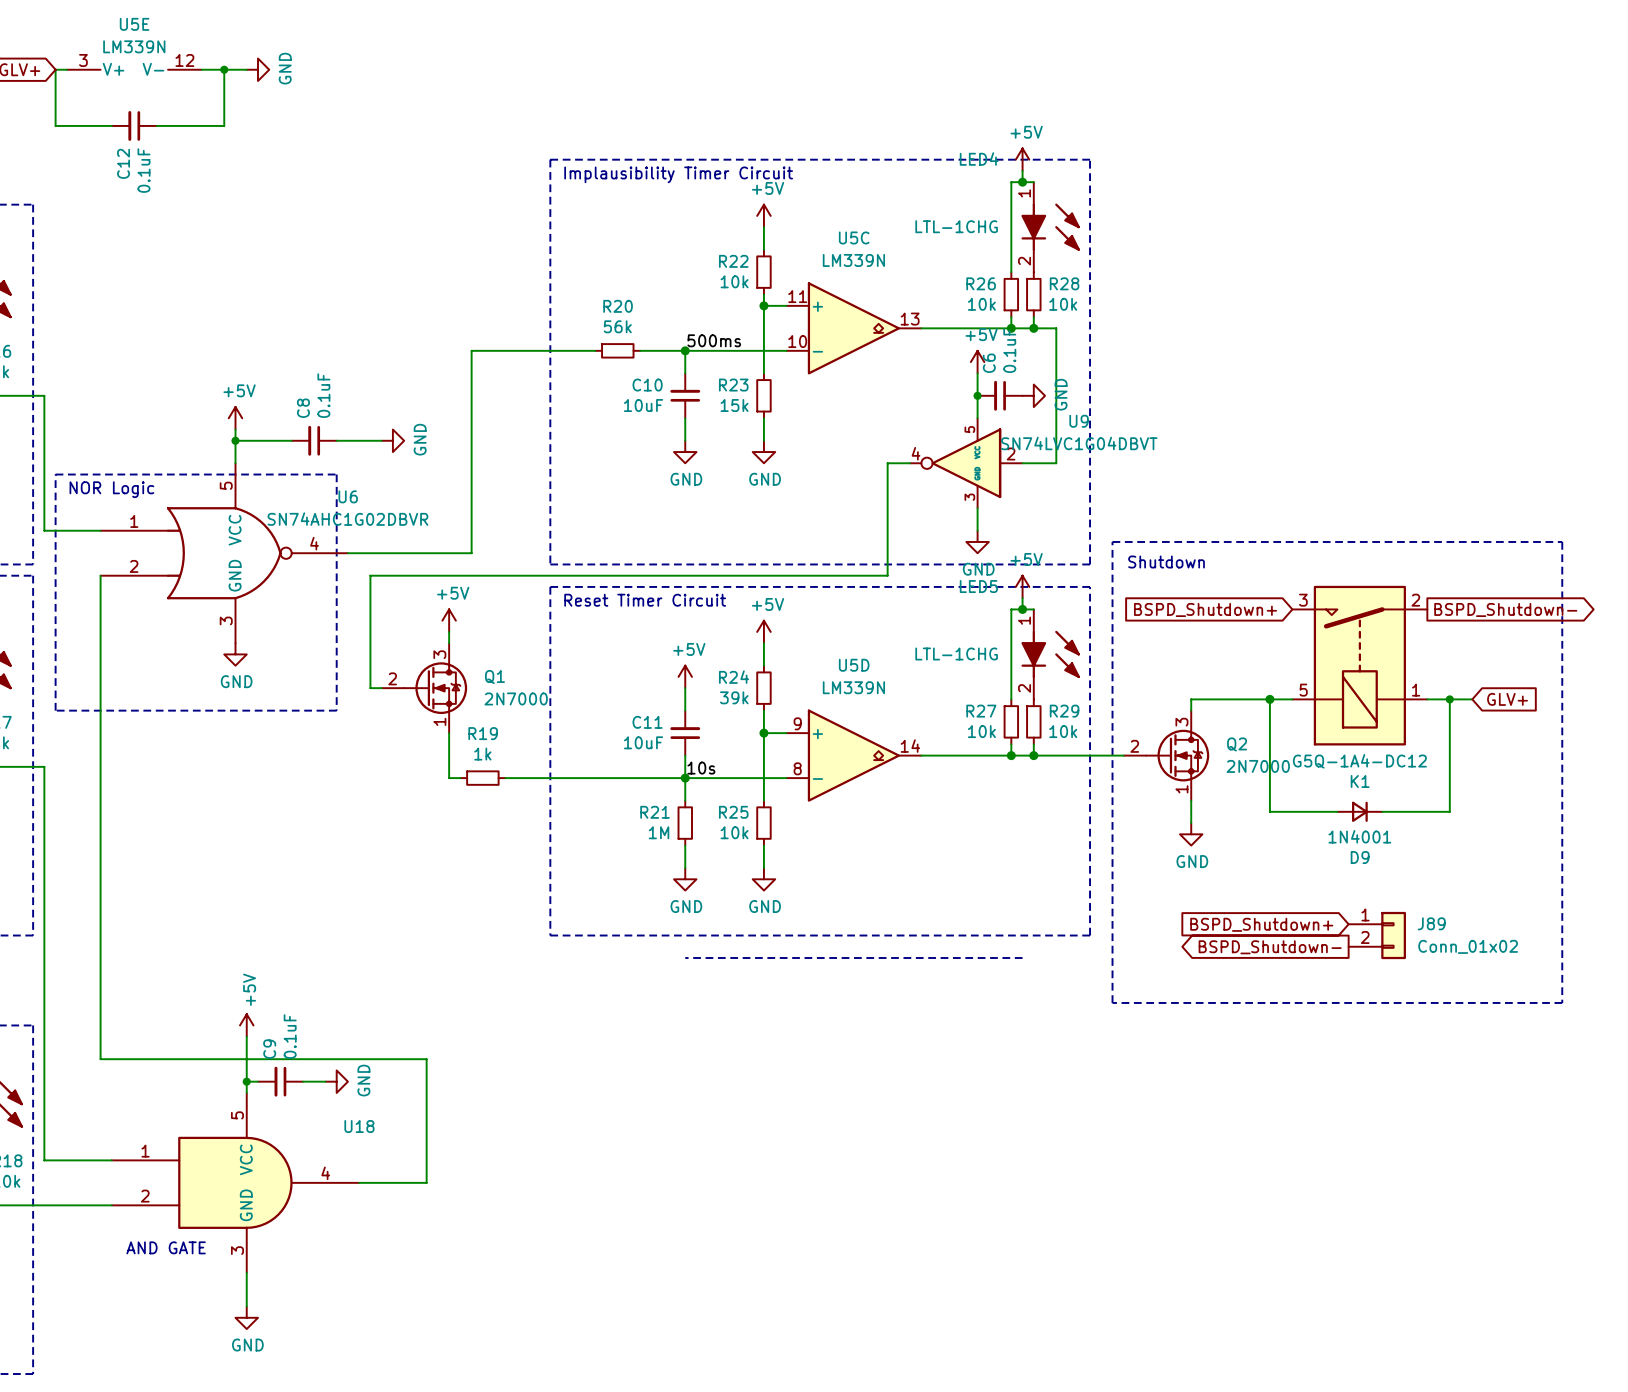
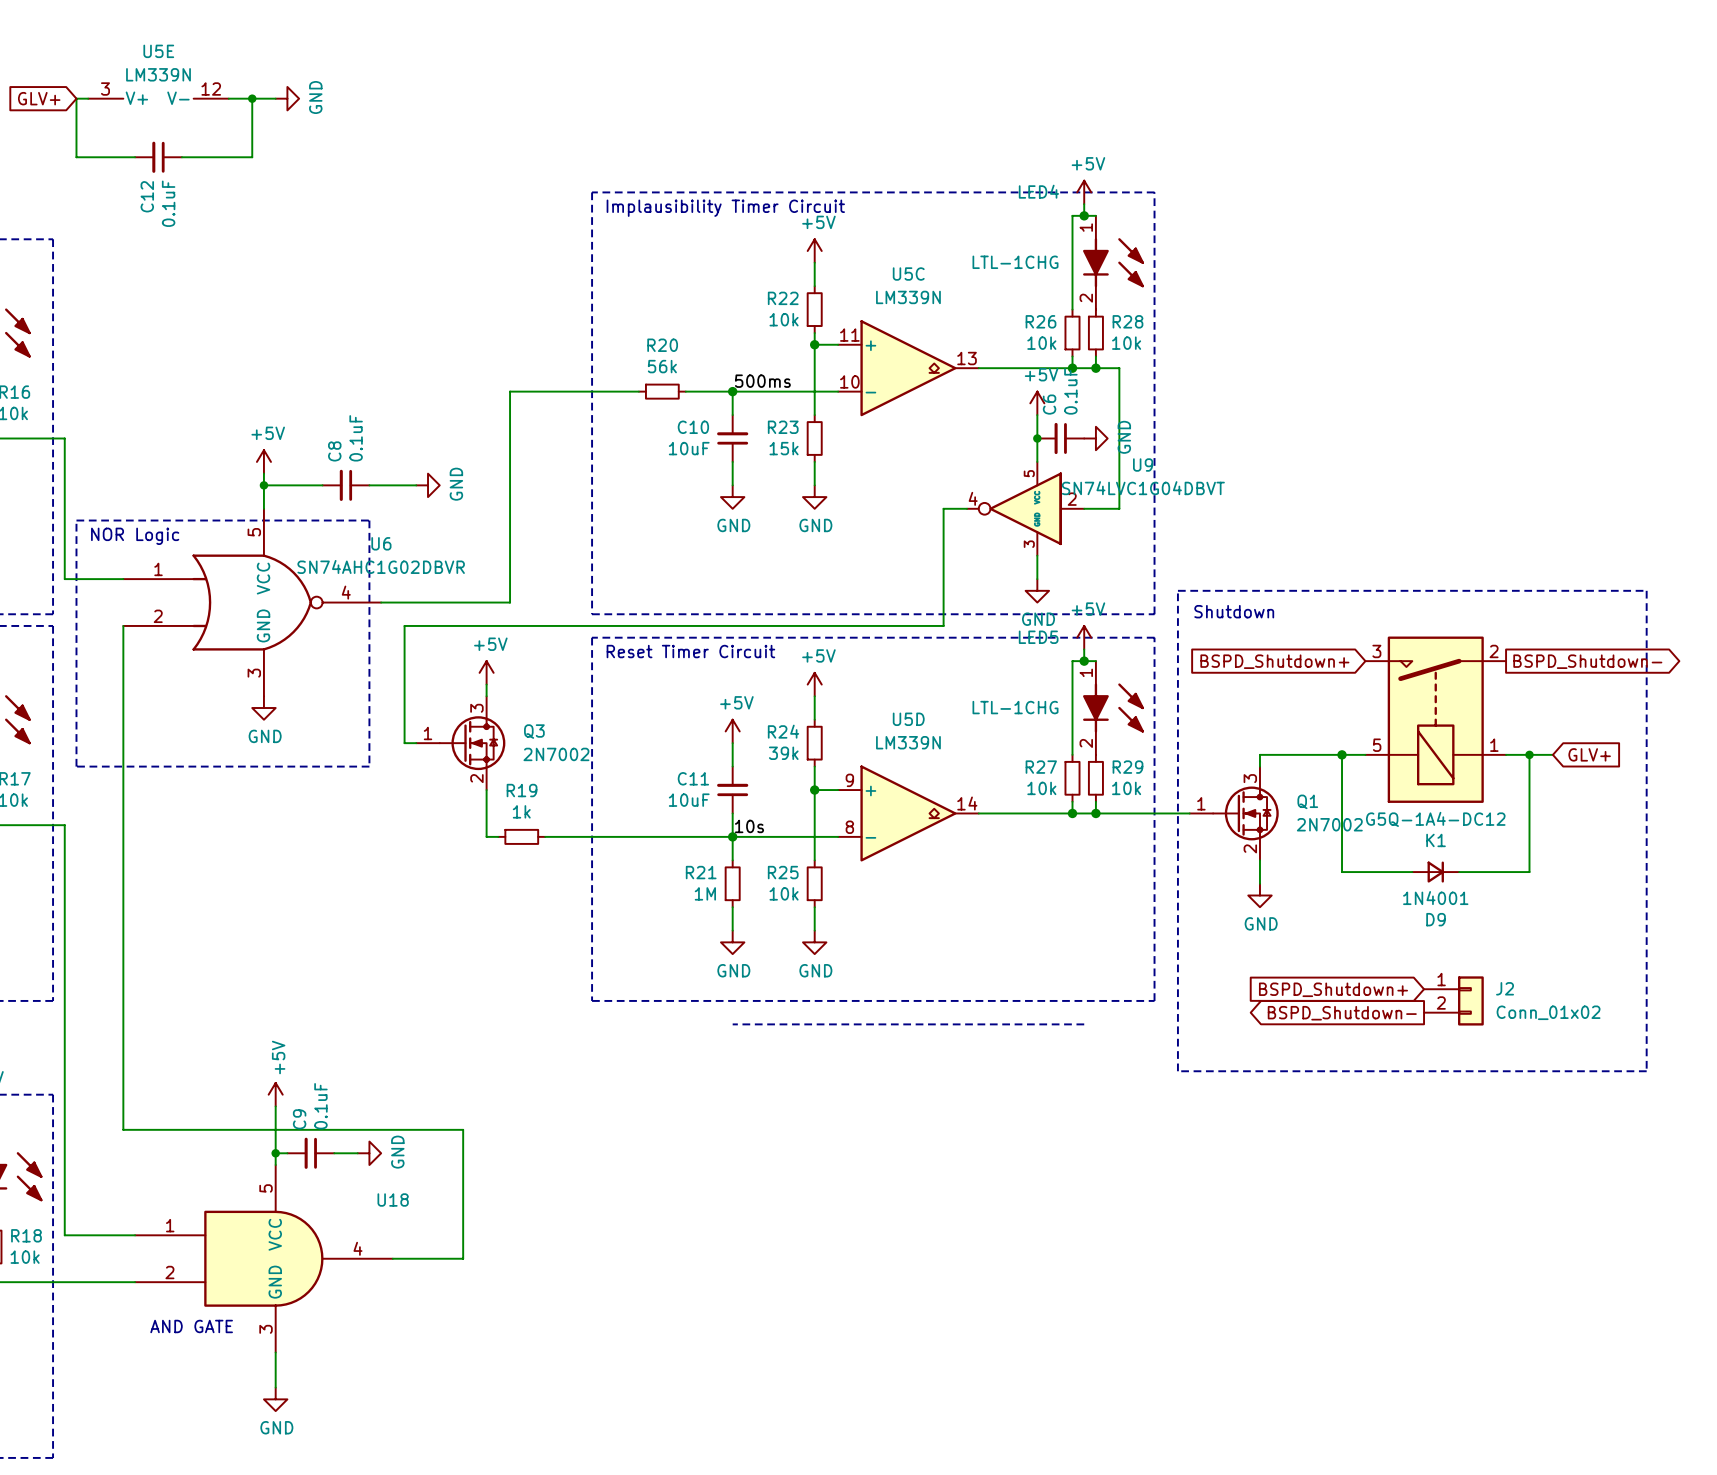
Q1 symbol: [381, 643, 468, 734] -> [1189, 766, 1279, 861]
Q3: none -> 2N7002 (460, 743)
Q1 value: 2N7000 (516, 698) -> 2N7002 (1329, 824)
Q2: 2N7000 (1166, 755) -> none
J89 name: J89 (1431, 923) -> J2 (1505, 988)

